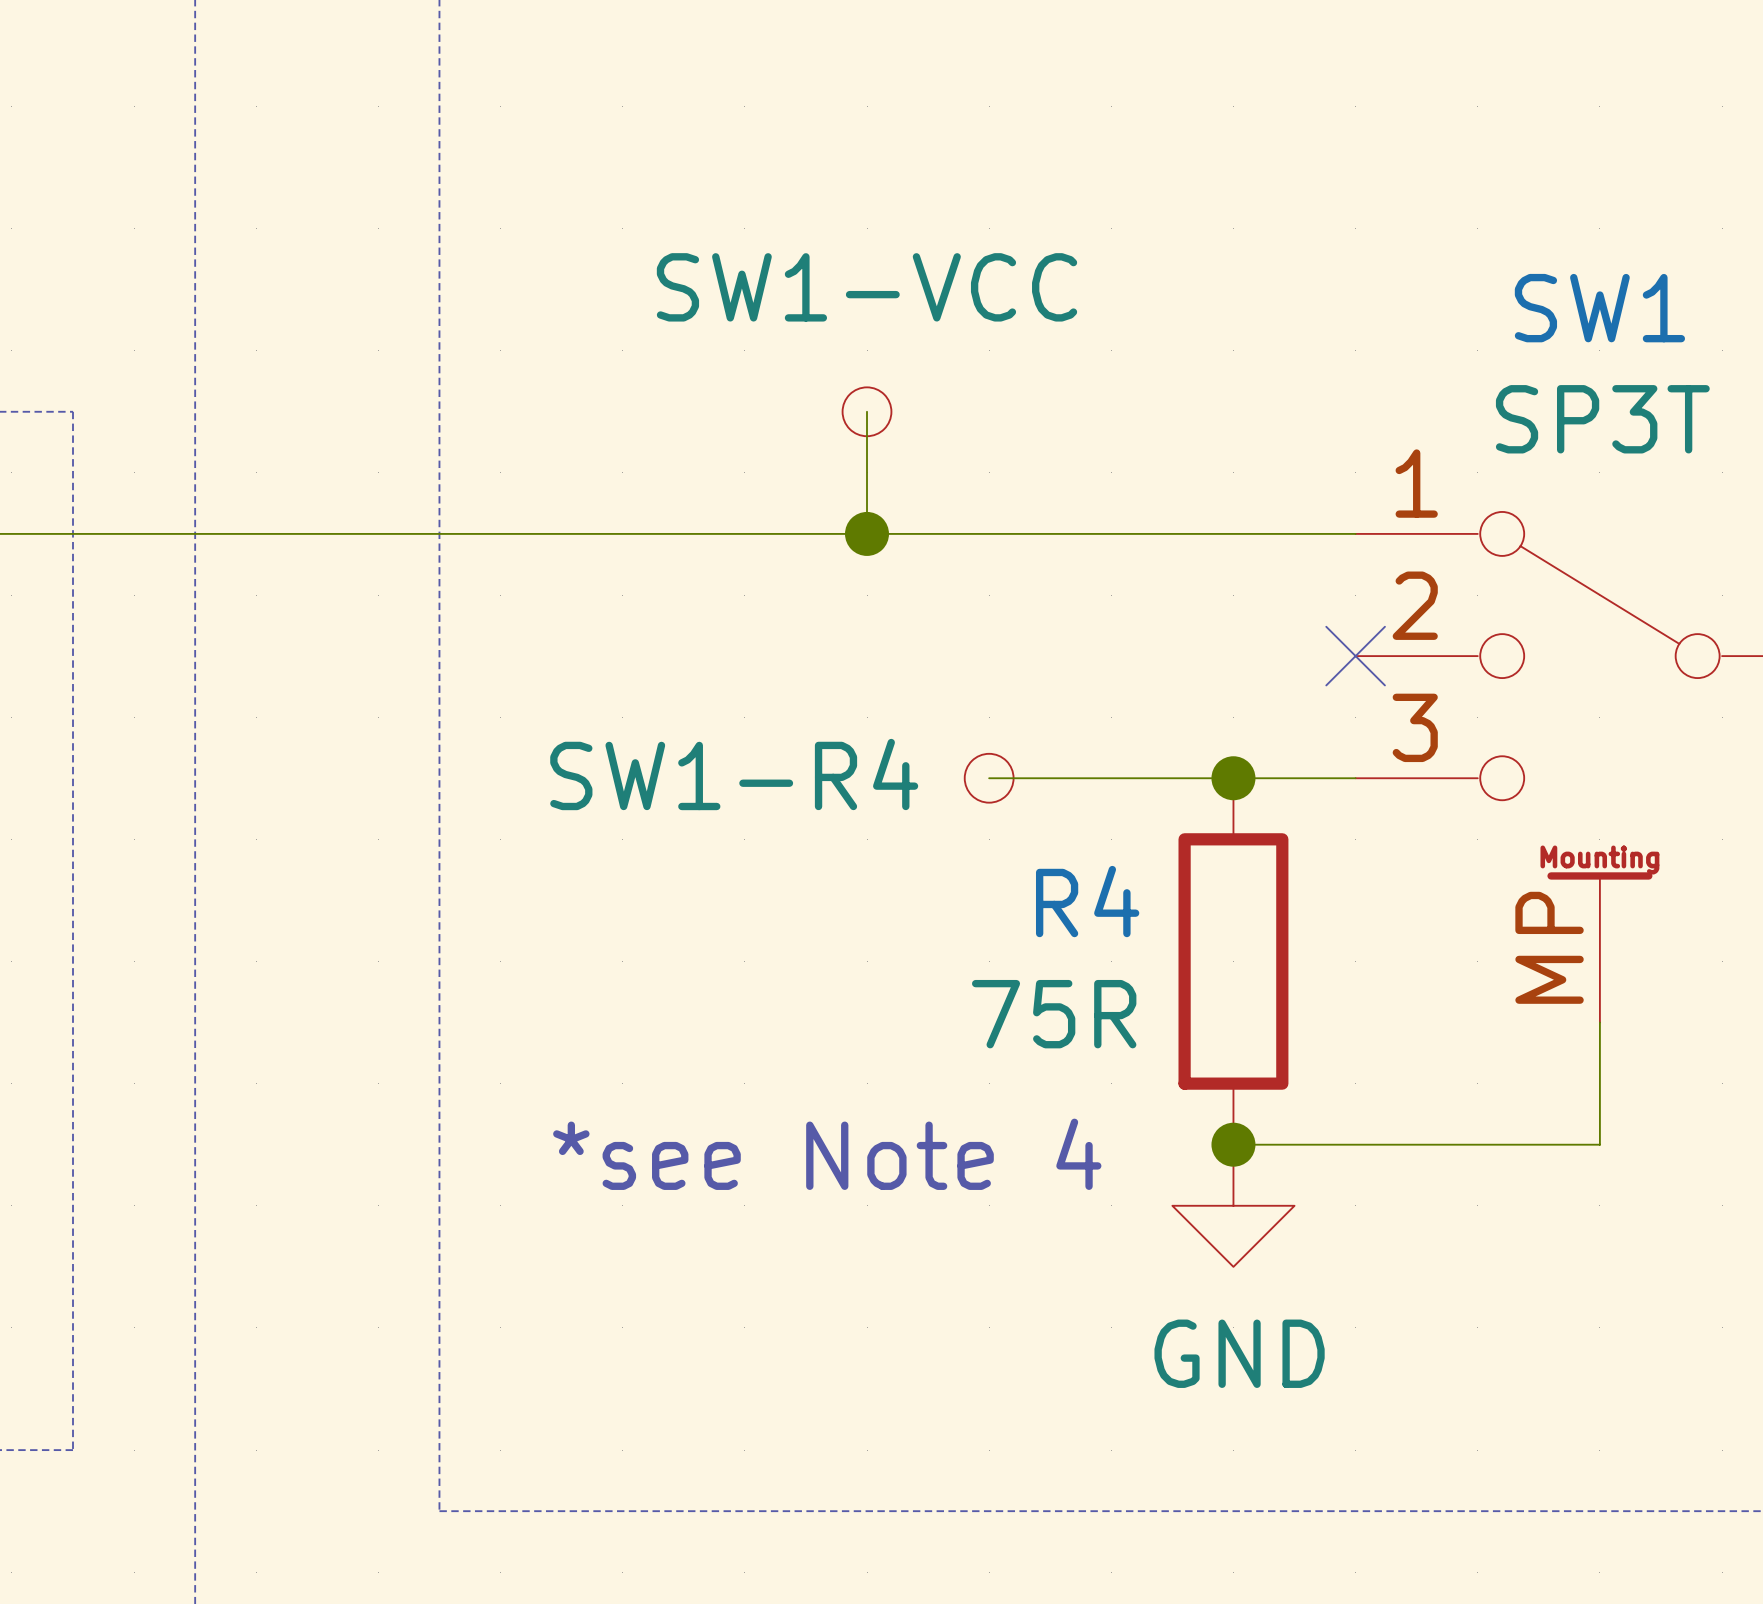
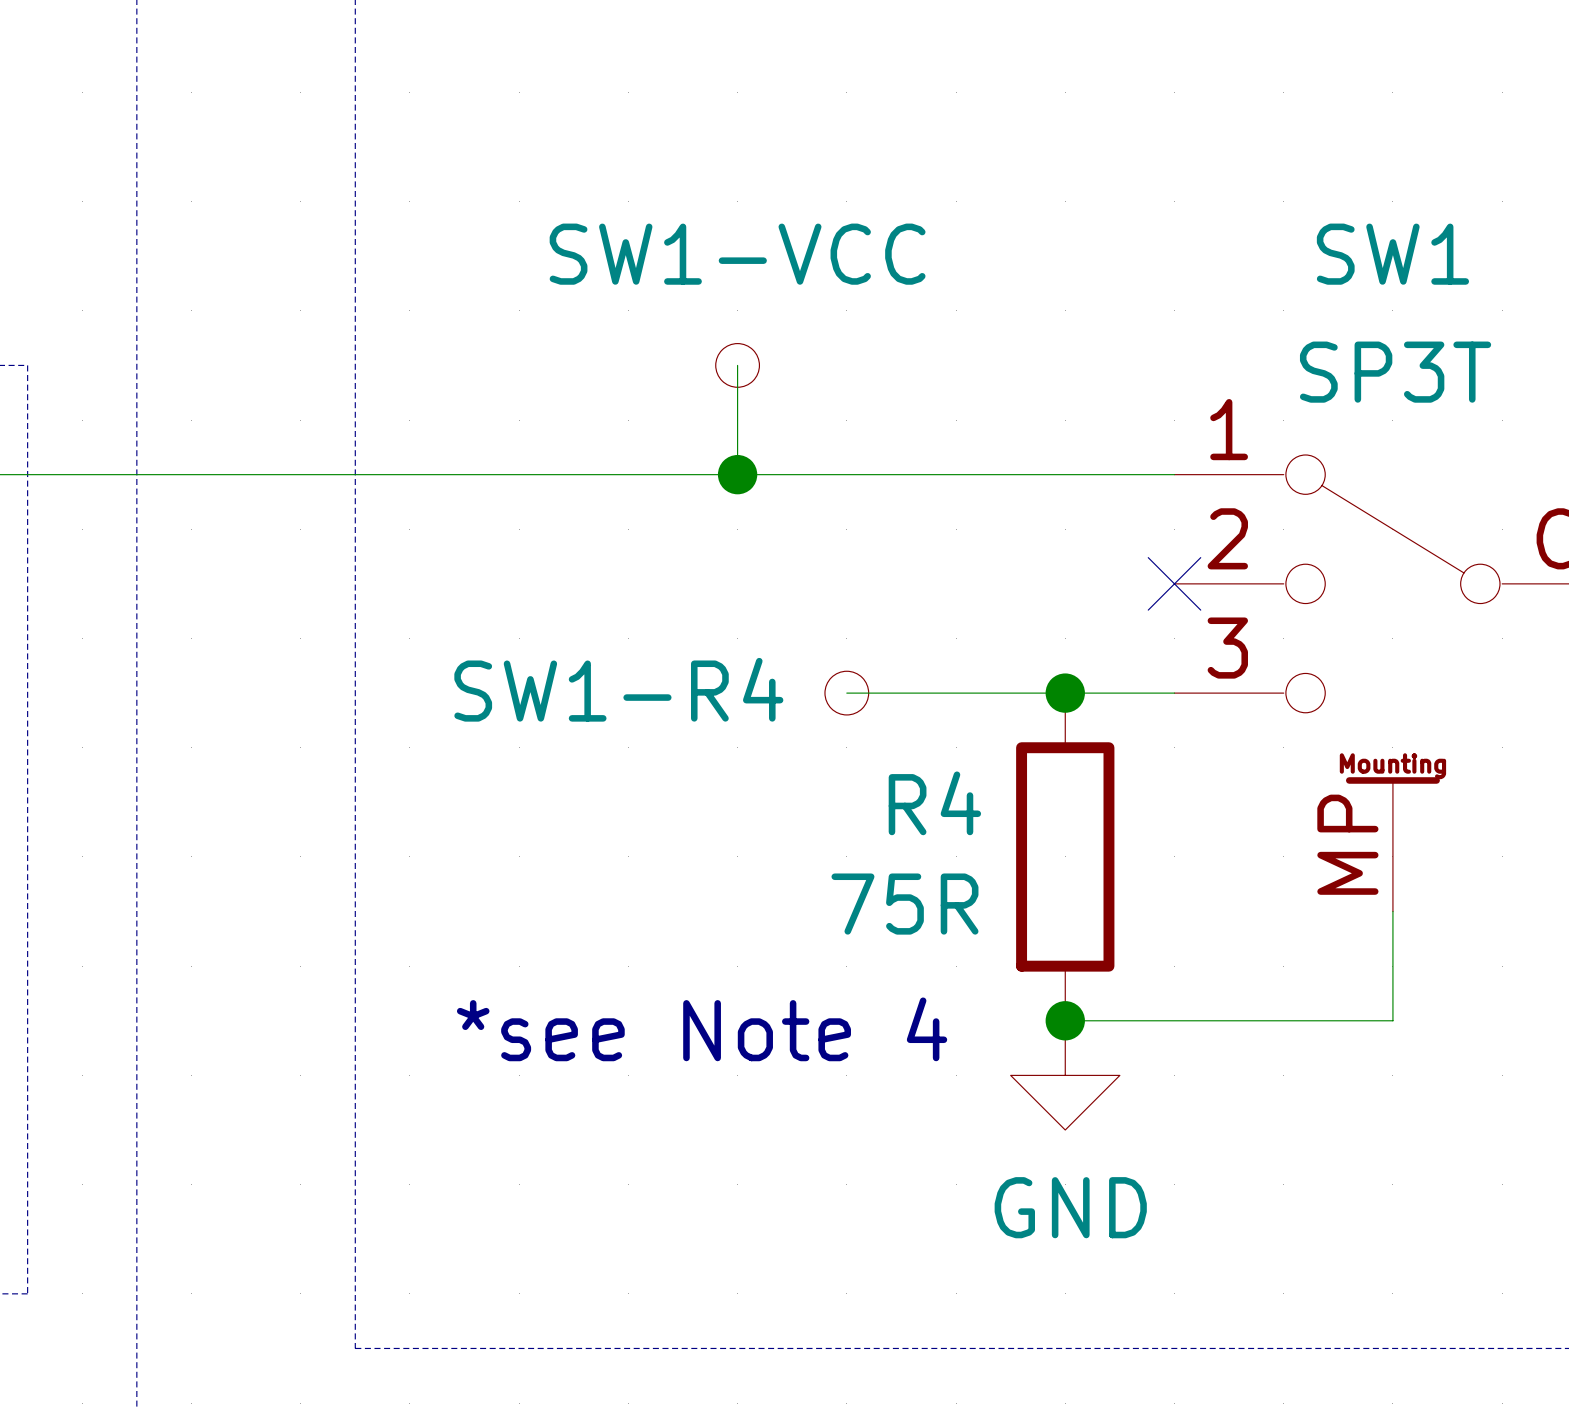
SW1 name position: SW1 (1599, 308) -> SW1 (1392, 254)

